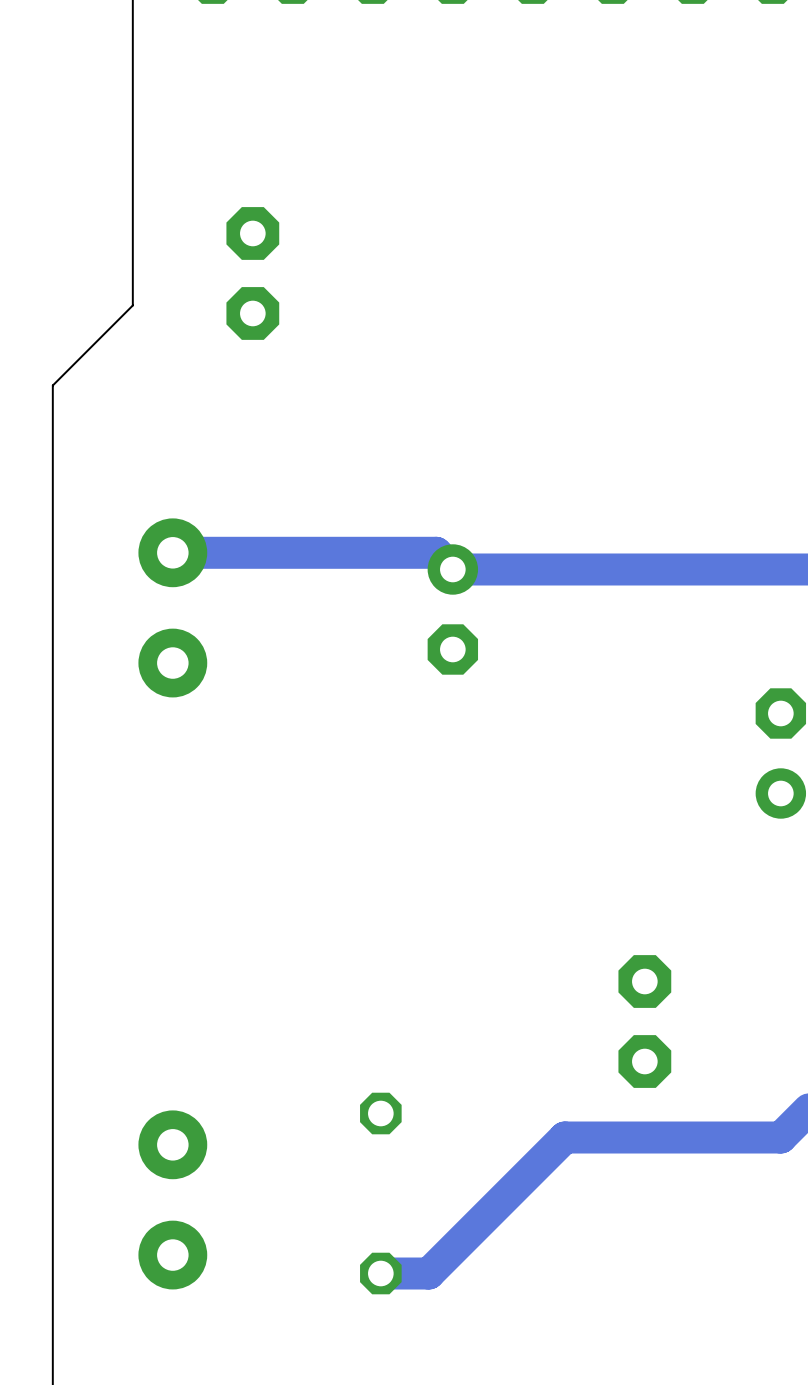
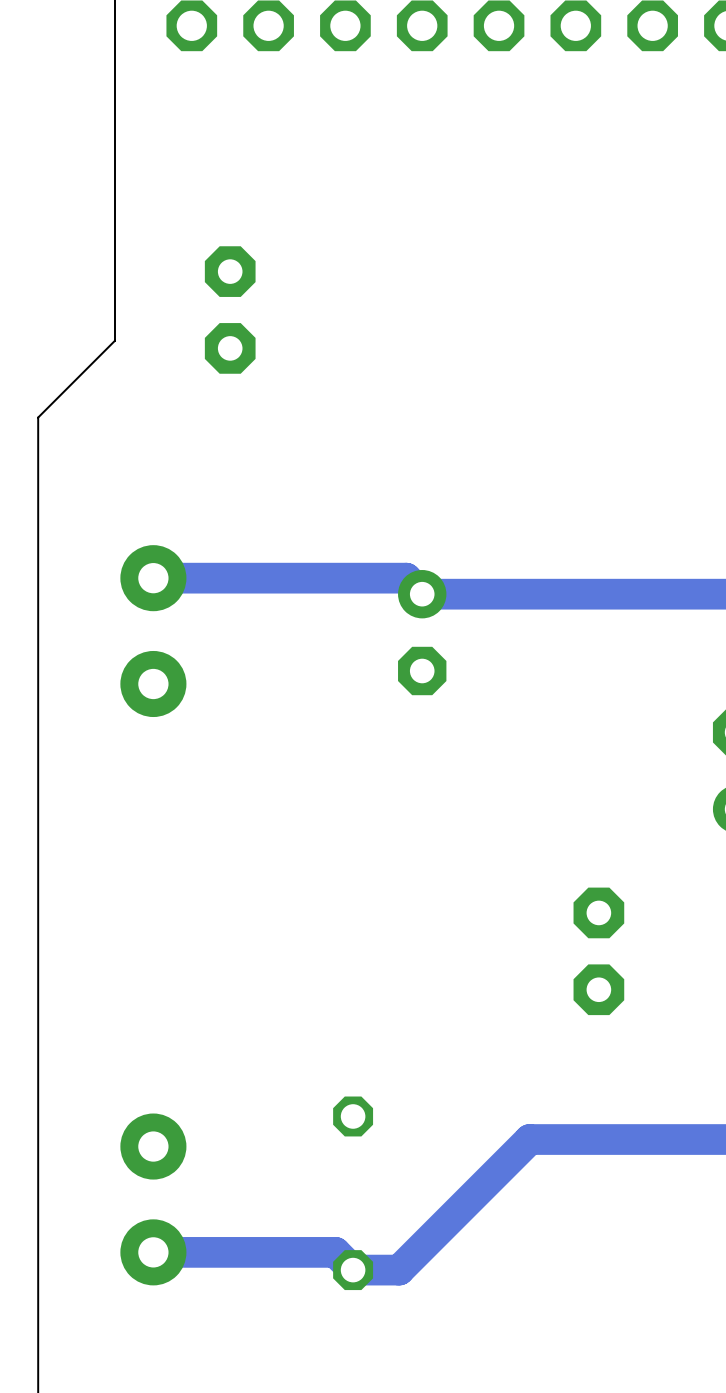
part position: (644, 1021) -> (598, 951)
track: none -> (153, 1252) (335, 1252) (353, 1270)

